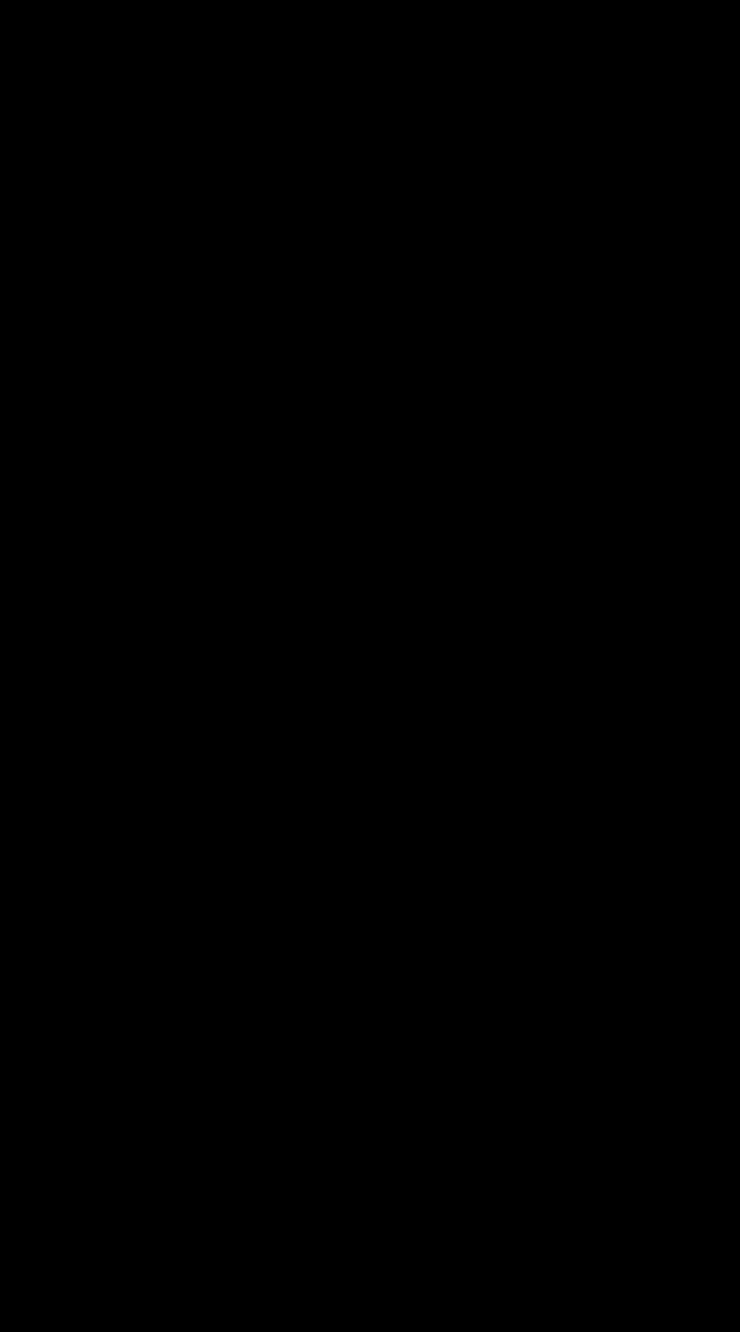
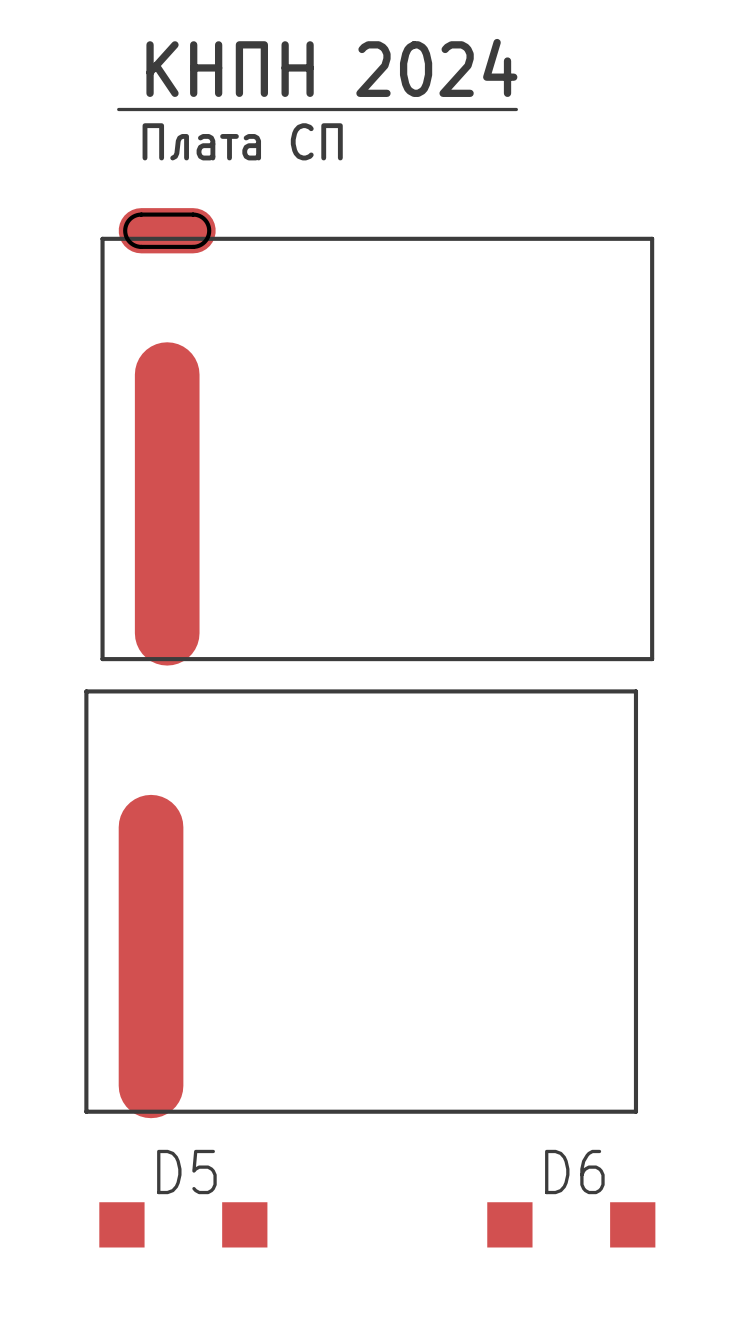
drawing: none -> [117, 107, 518, 112]
part: none -> (377, 436)
part: none -> (361, 903)
D5: none -> (183, 1224)
D6: none -> (571, 1224)

